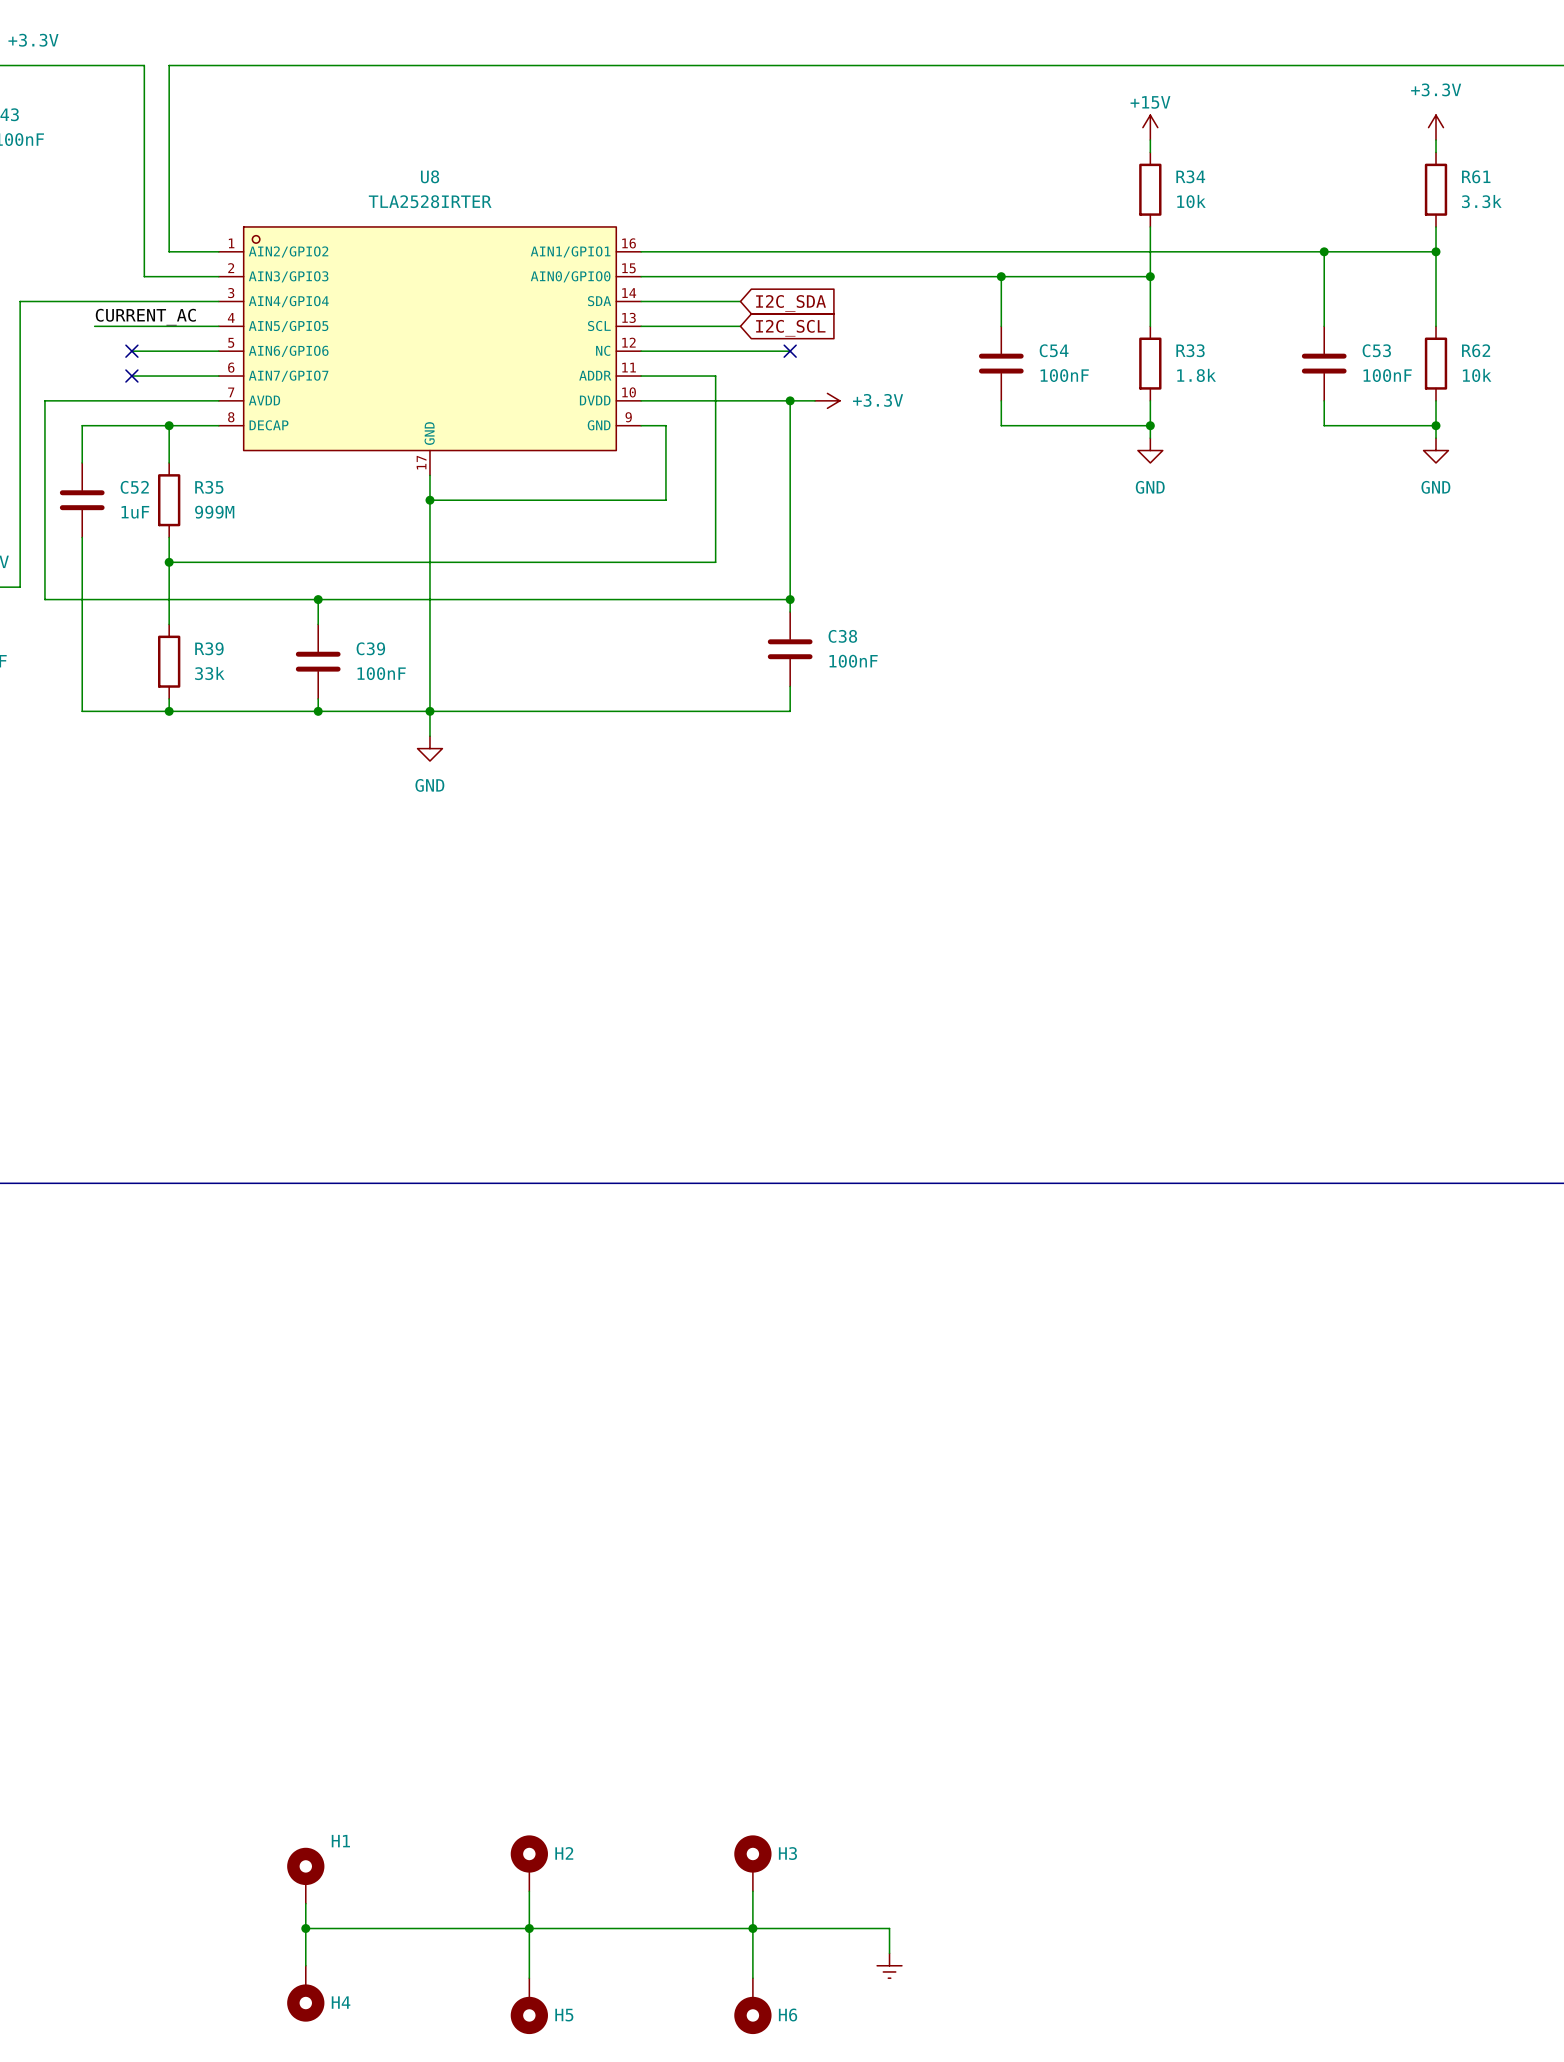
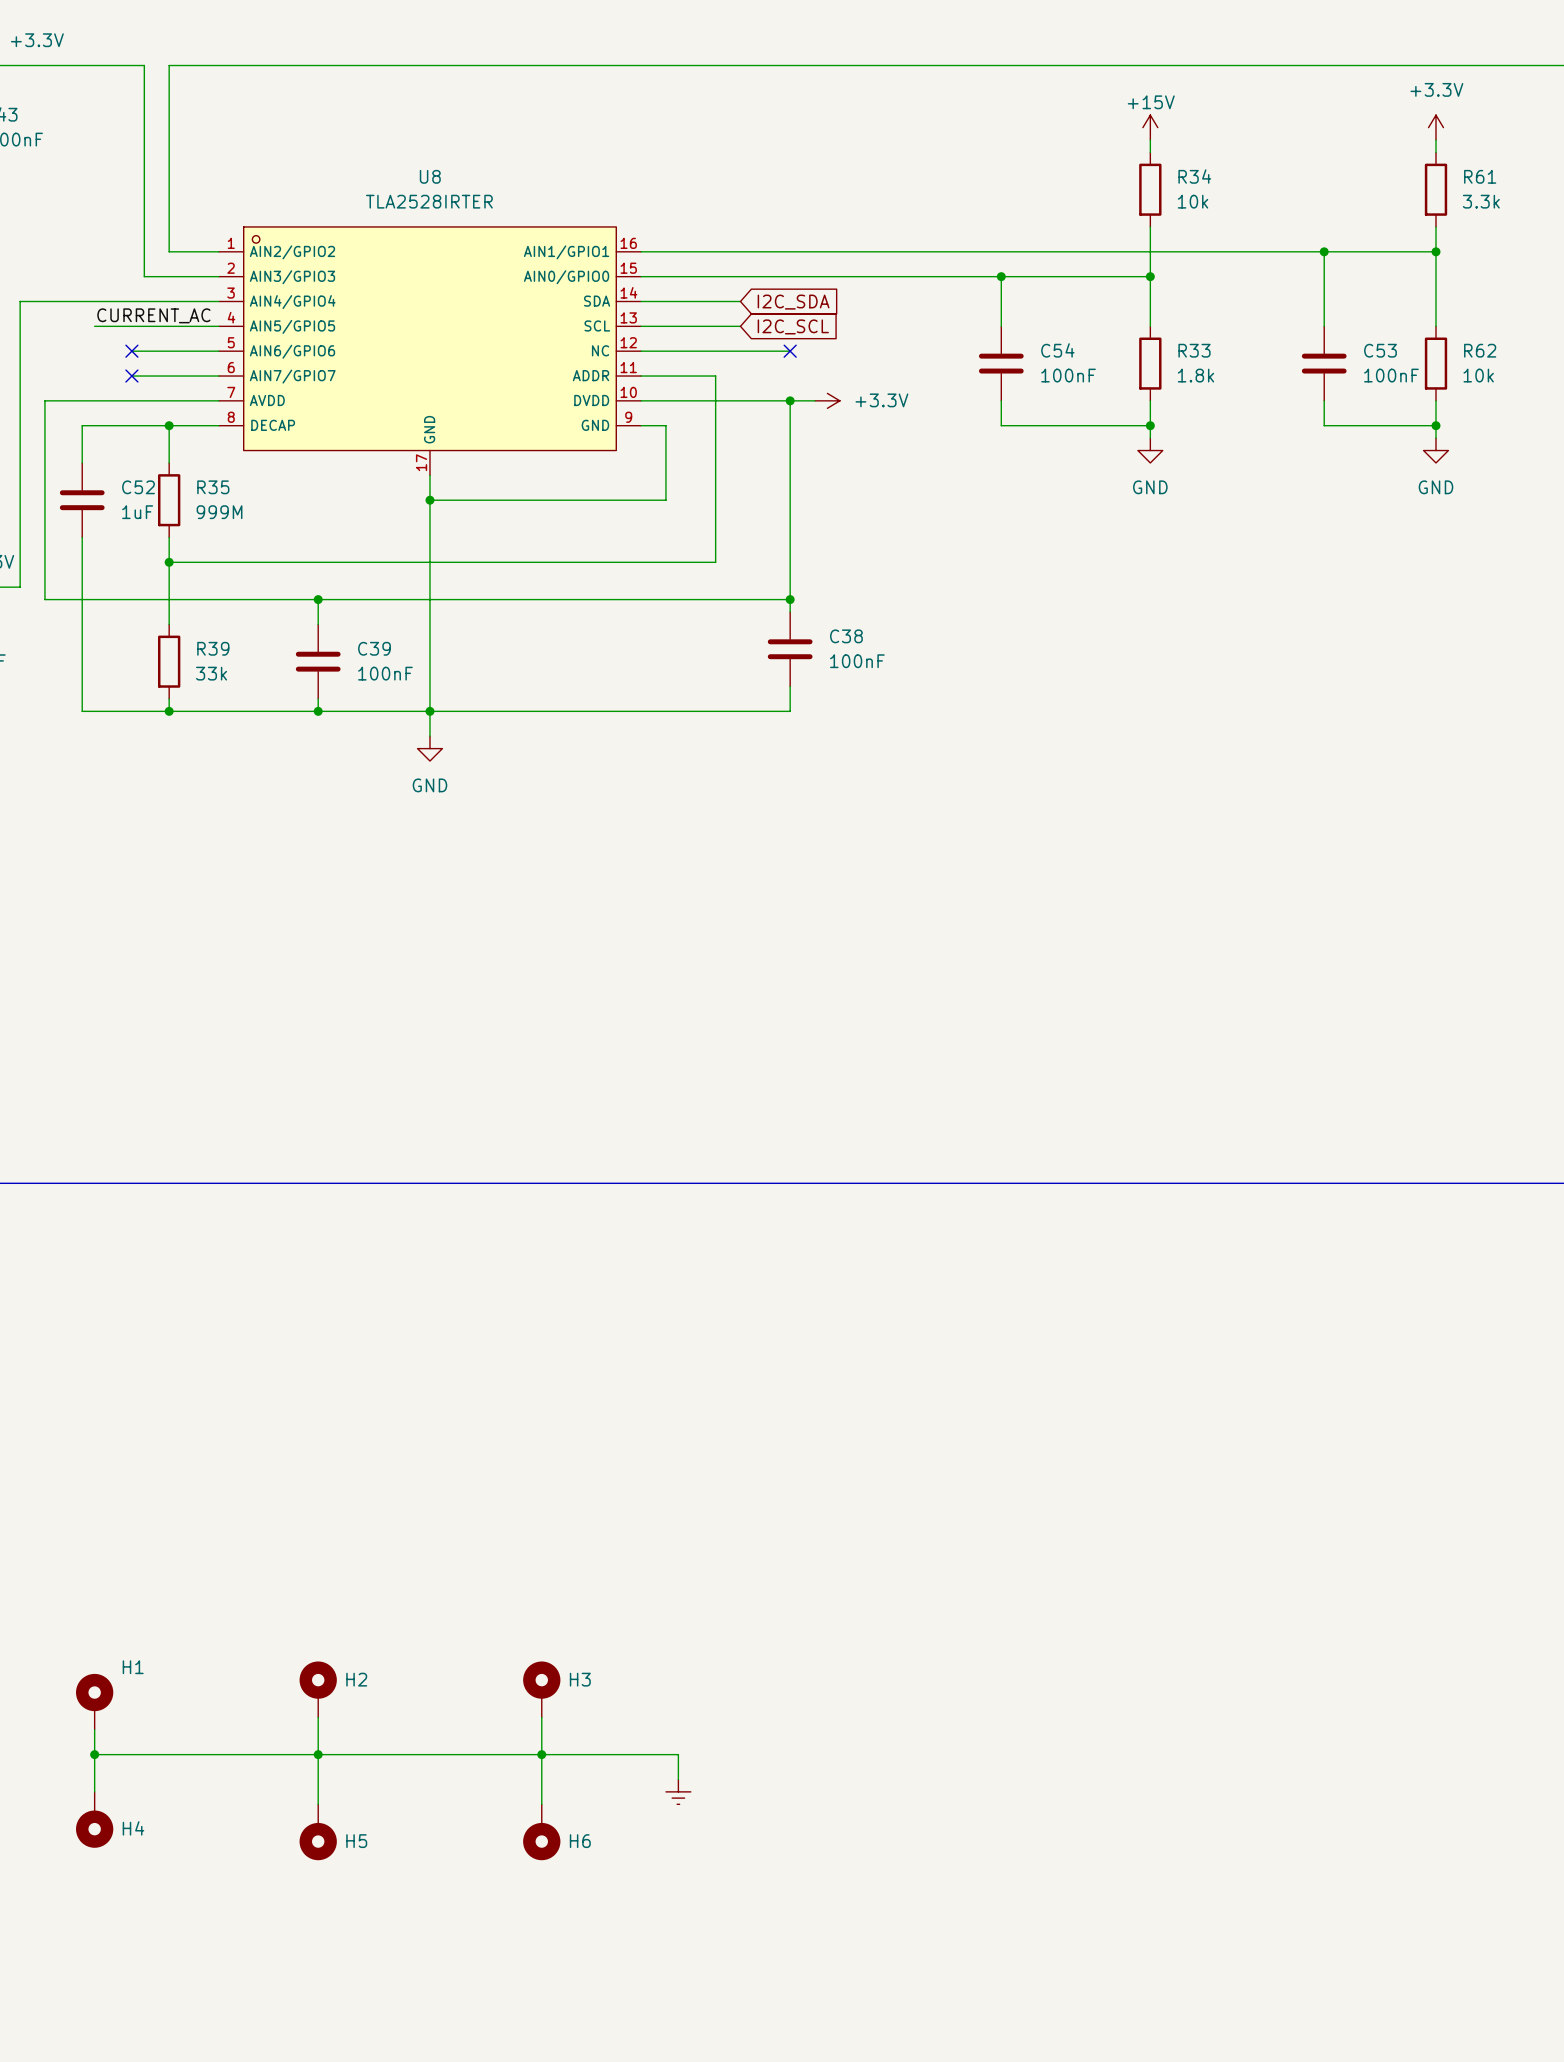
wire: none -> (318, 1717) (318, 1804)
wire: none -> (94, 1729) (94, 1791)
wire: none -> (94, 1754) (678, 1754) (678, 1779)
junction: none -> (94, 1754)
junction: none -> (318, 1754)
junction: none -> (541, 1754)
power symbol: none -> (678, 1791)
H2 position: (529, 1863) -> (318, 1689)
H3 position: (752, 1863) -> (541, 1689)
H1 position: (305, 1875) -> (94, 1701)
wire: (529, 1891) (529, 1978) -> (541, 1717) (541, 1804)
wire: (752, 1891) (752, 1978) -> none
wire: (305, 1903) (305, 1965) -> none
wire: (305, 1928) (889, 1928) (889, 1953) -> none
junction: (305, 1928) -> none
junction: (529, 1928) -> none
junction: (752, 1928) -> none
power symbol: (889, 1965) -> none
H4 position: (305, 1993) -> (94, 1819)
H5 position: (529, 2006) -> (318, 1832)
H6 position: (752, 2006) -> (541, 1832)

